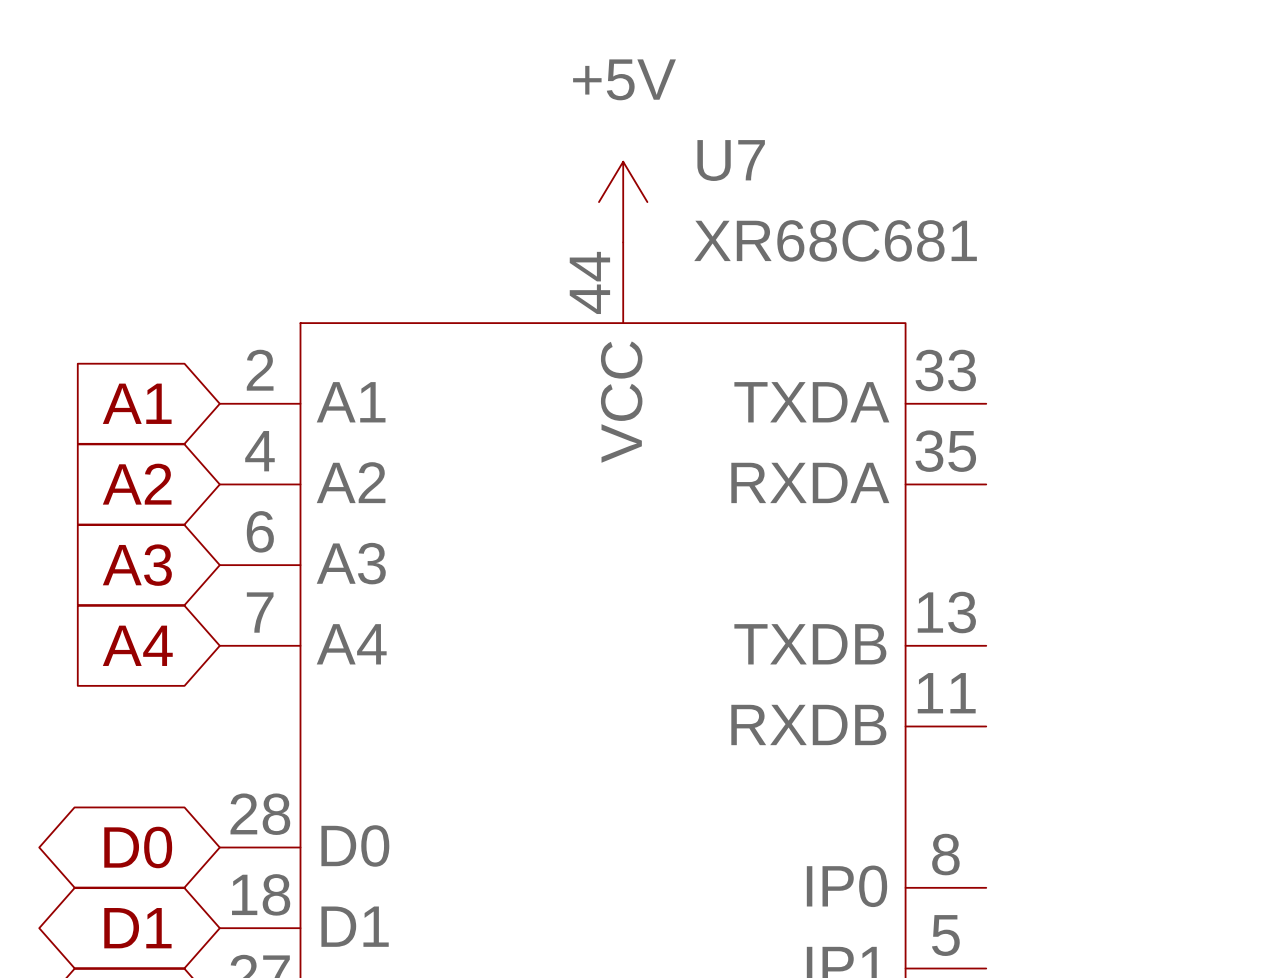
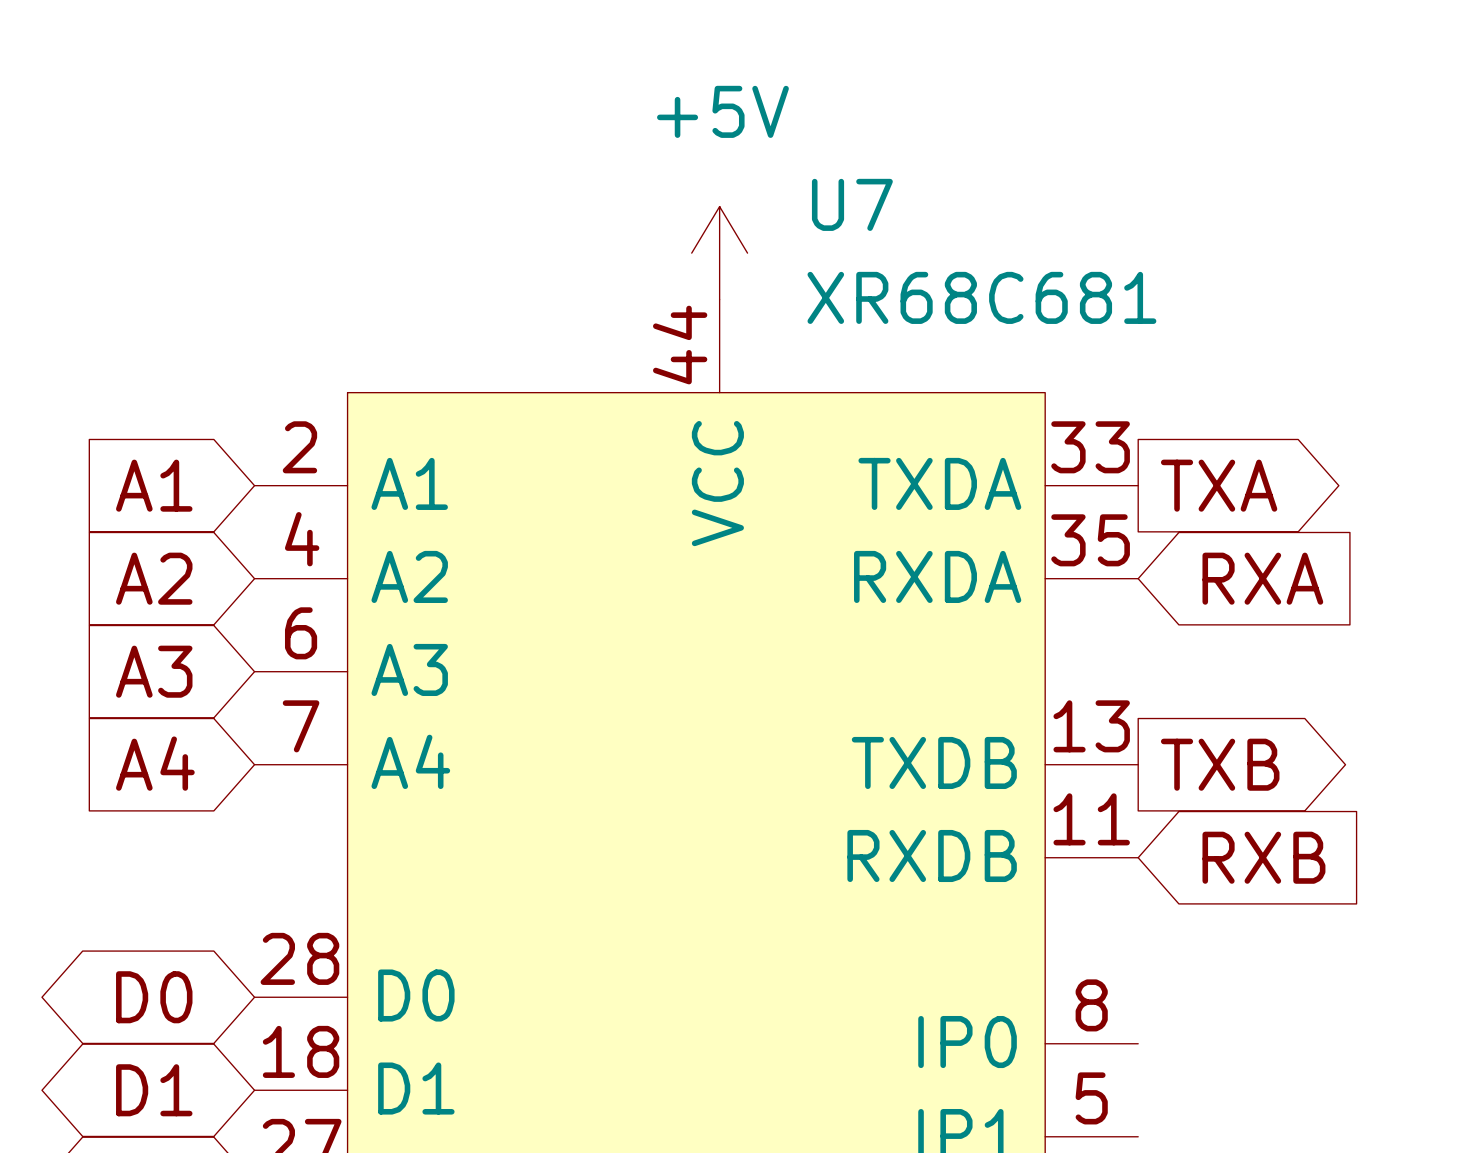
global label: none -> TXA (1219, 485)
global label: none -> RXA (1262, 578)
global label: none -> TXB (1220, 764)
global label: none -> RXB (1263, 857)

